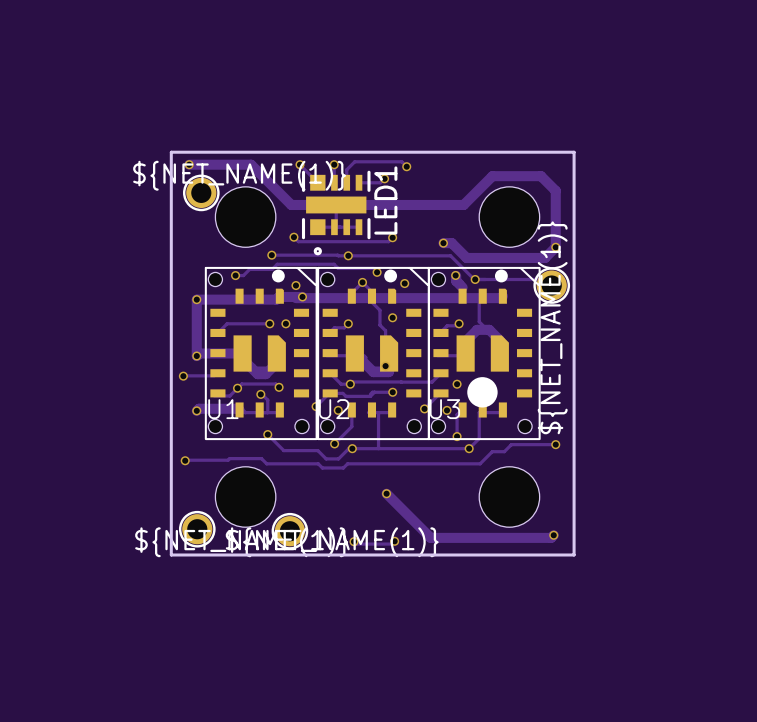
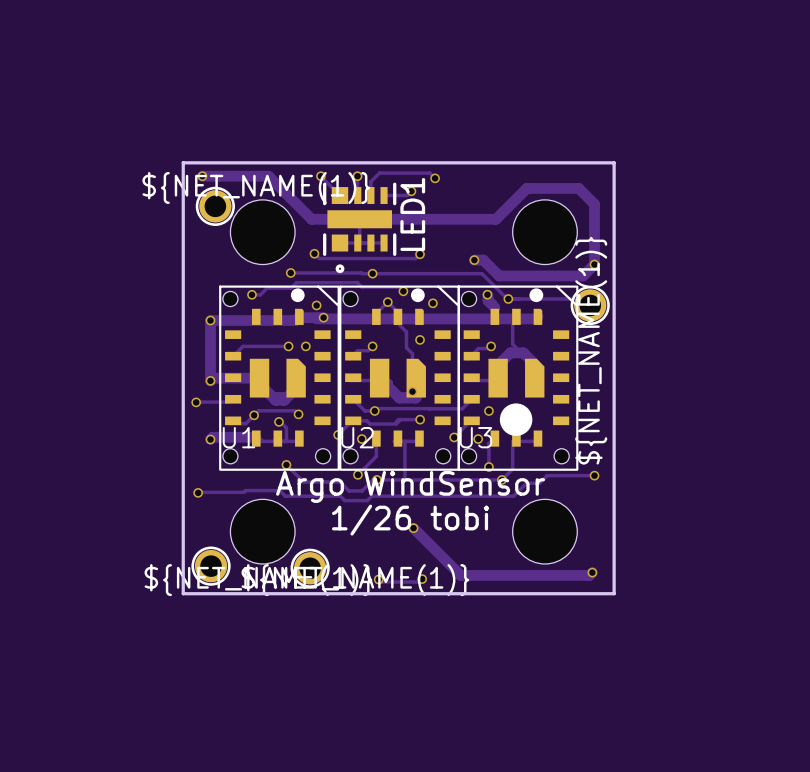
text: none -> Argo WindSensor (410, 486)
text: none -> 1/26 tobi (410, 520)

